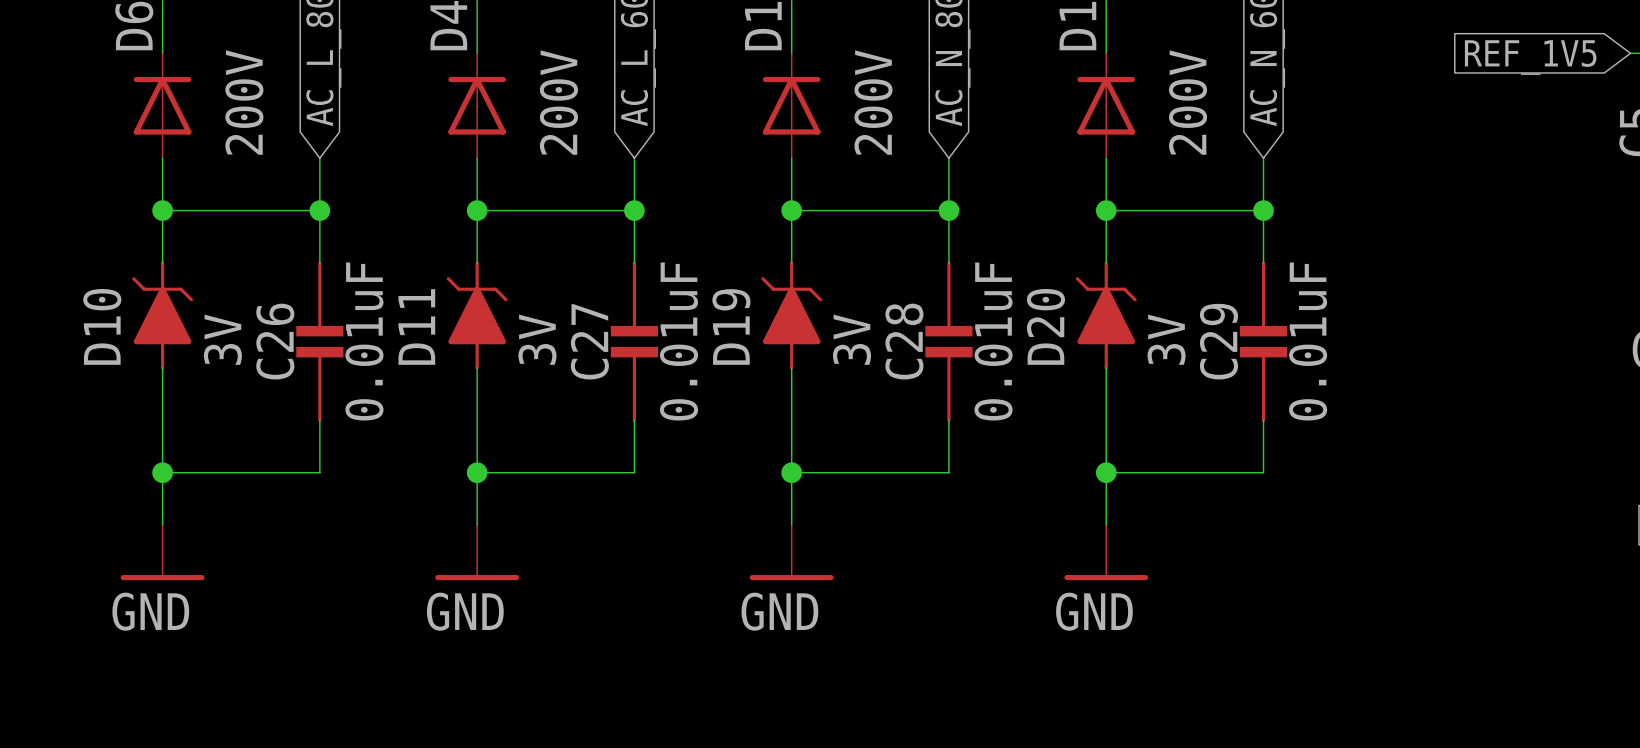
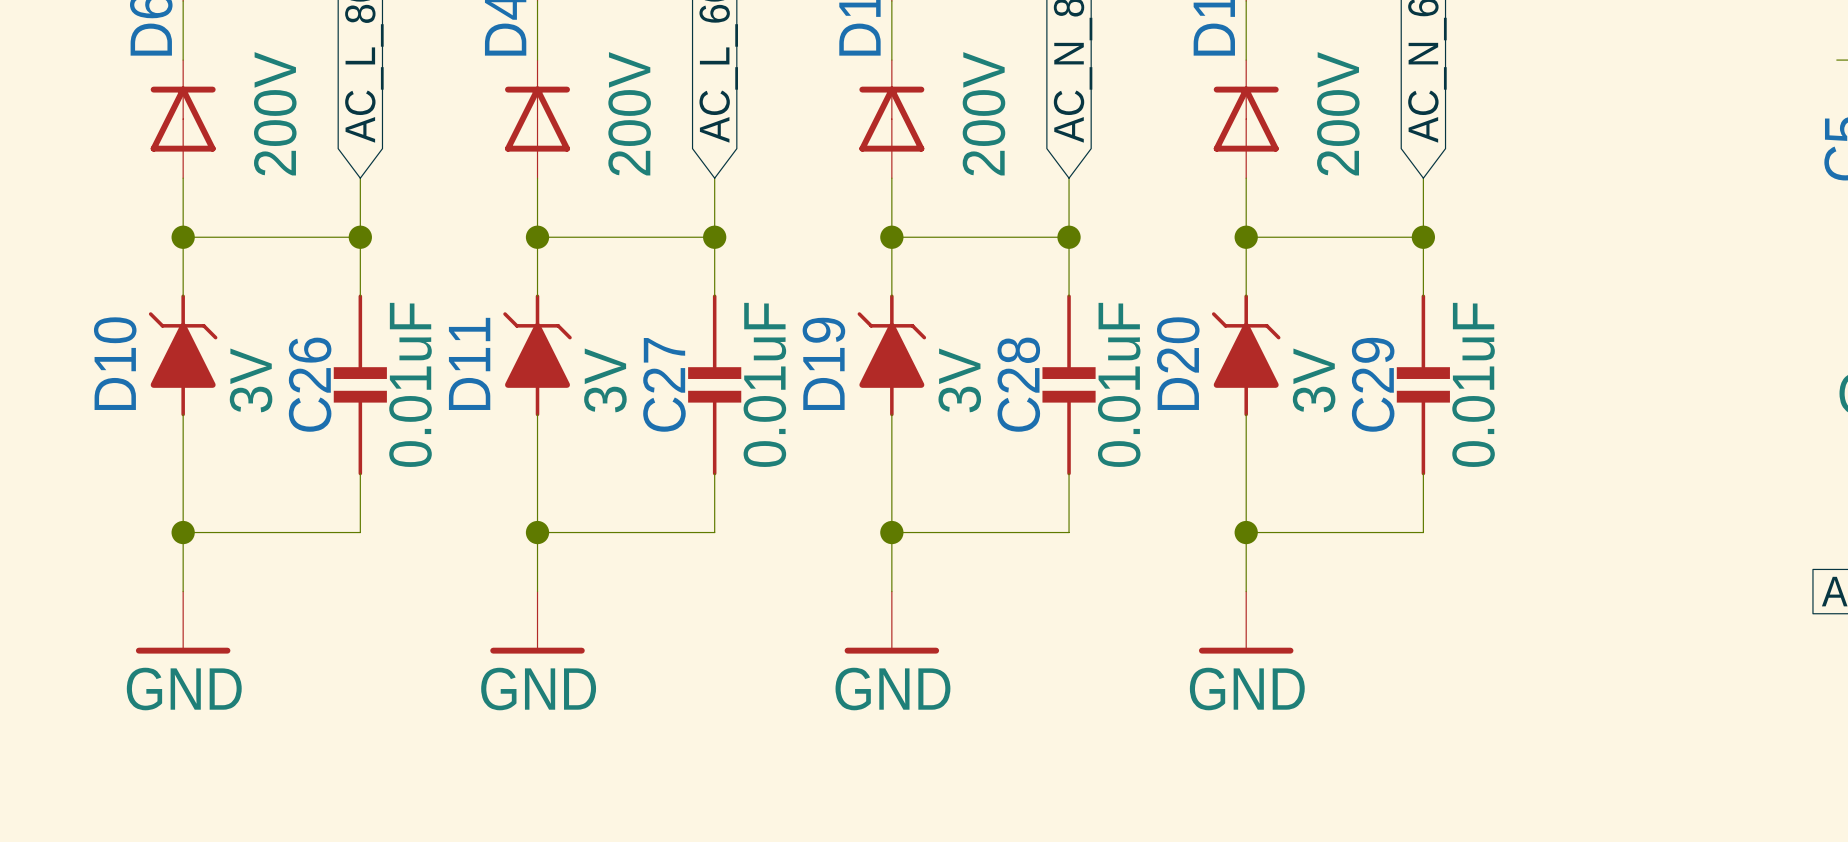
global label: REF_1V5 (1530, 57) -> none

